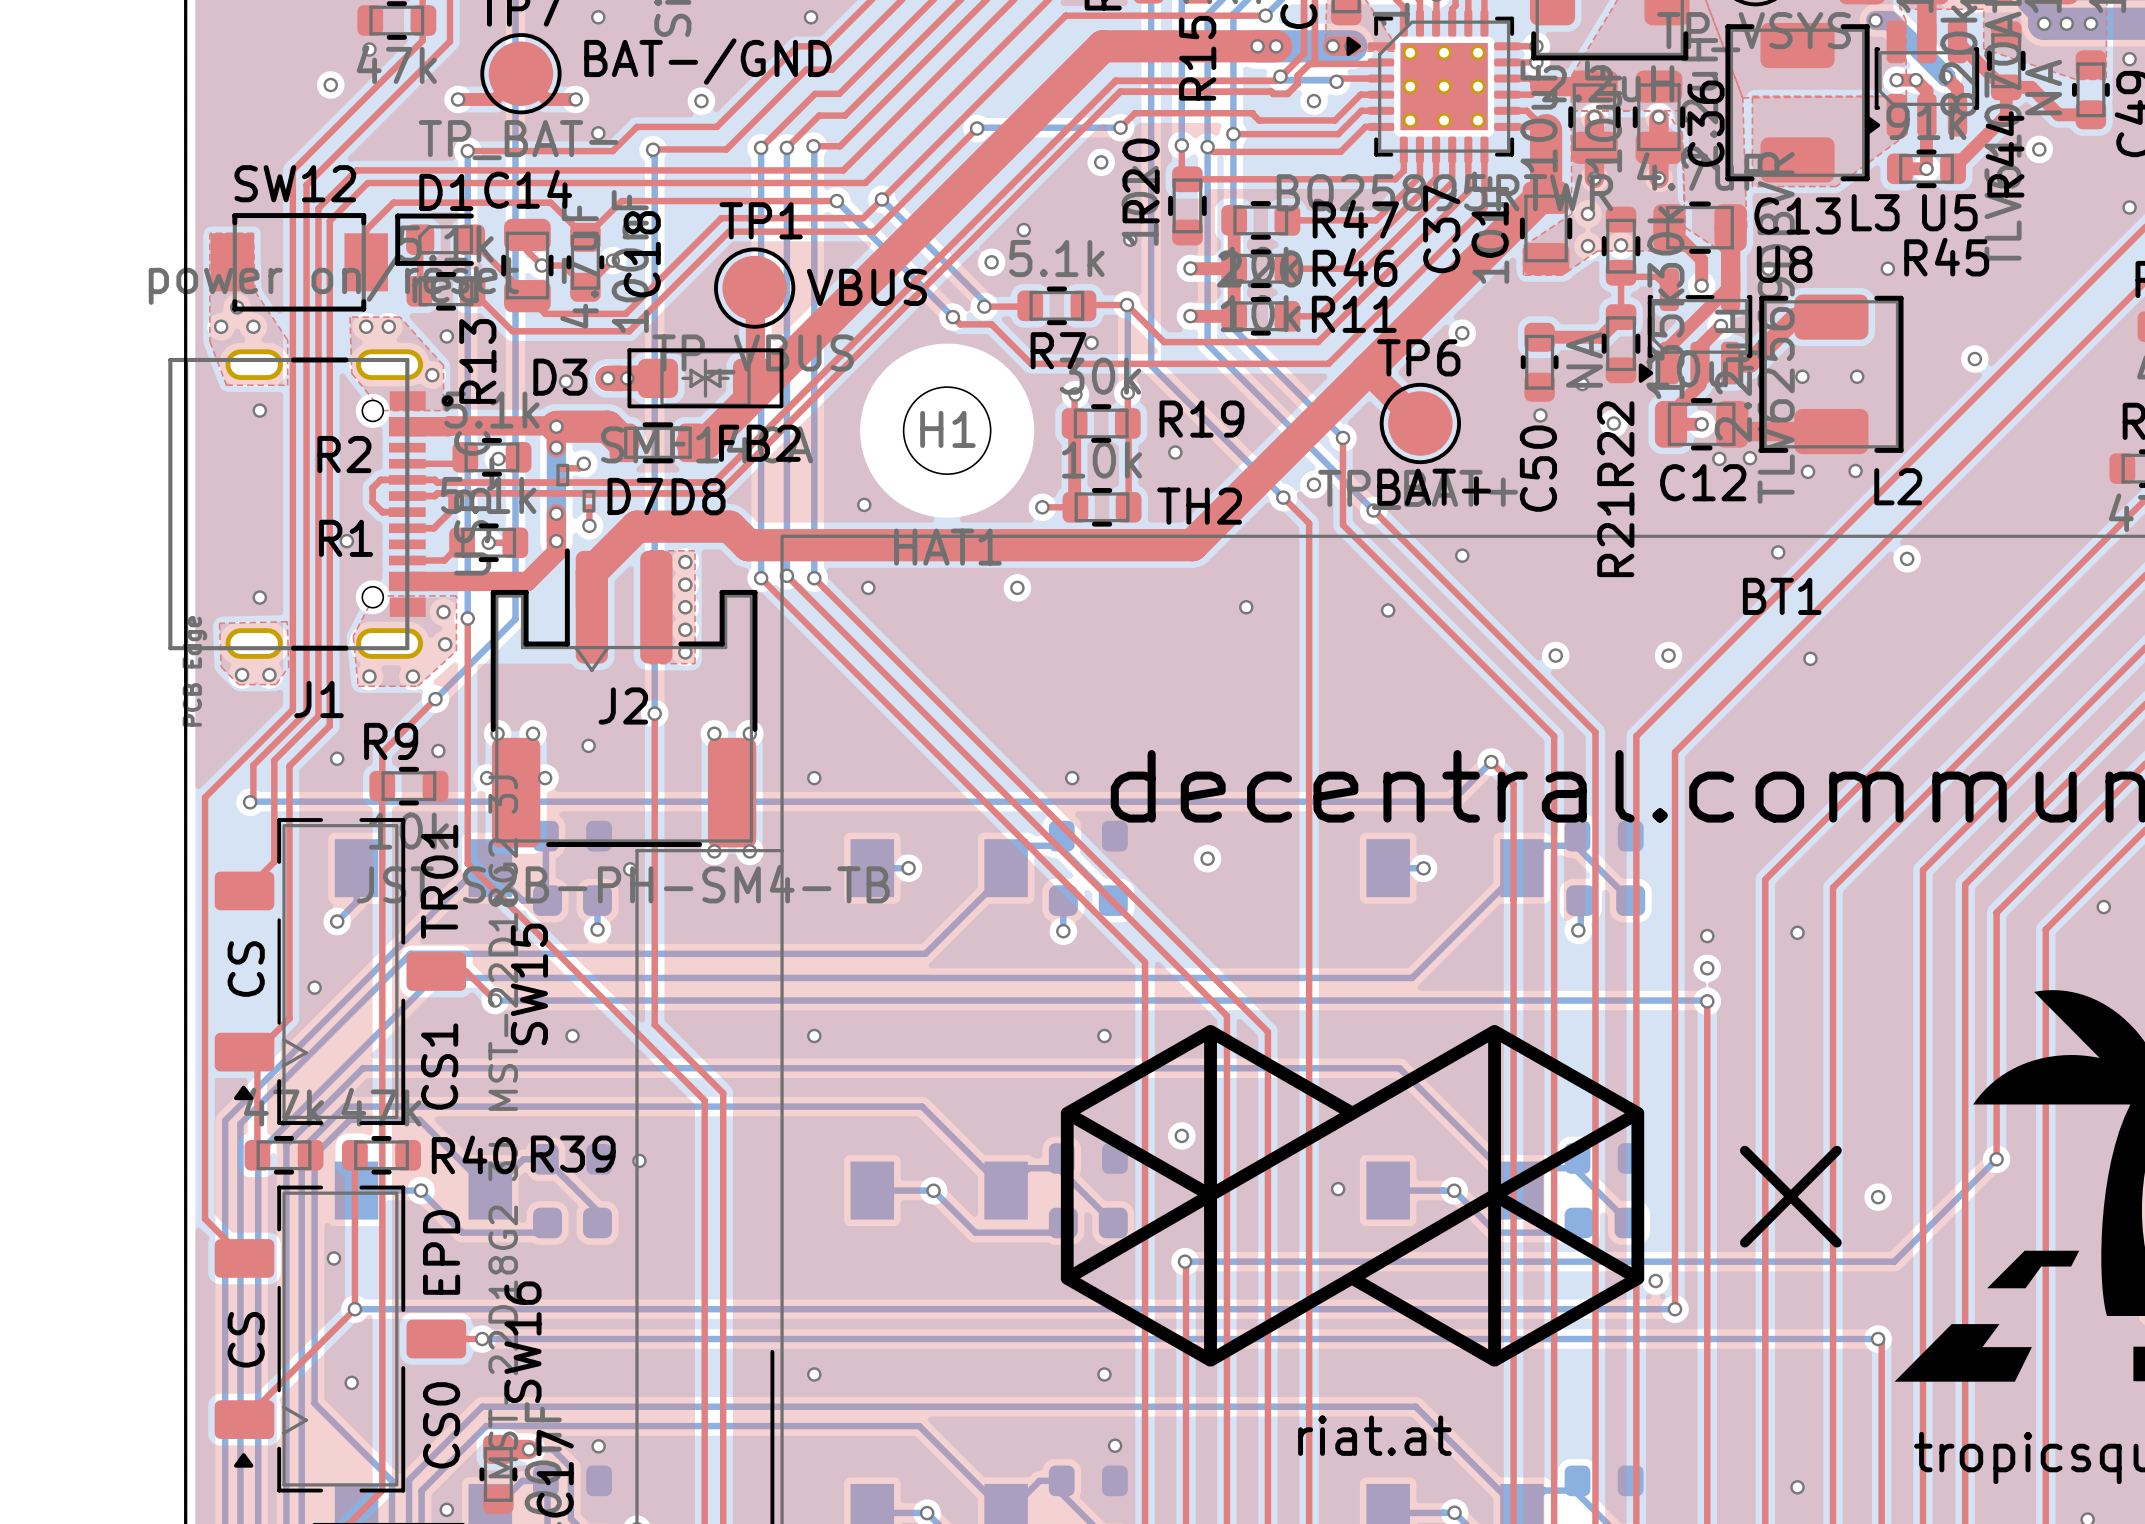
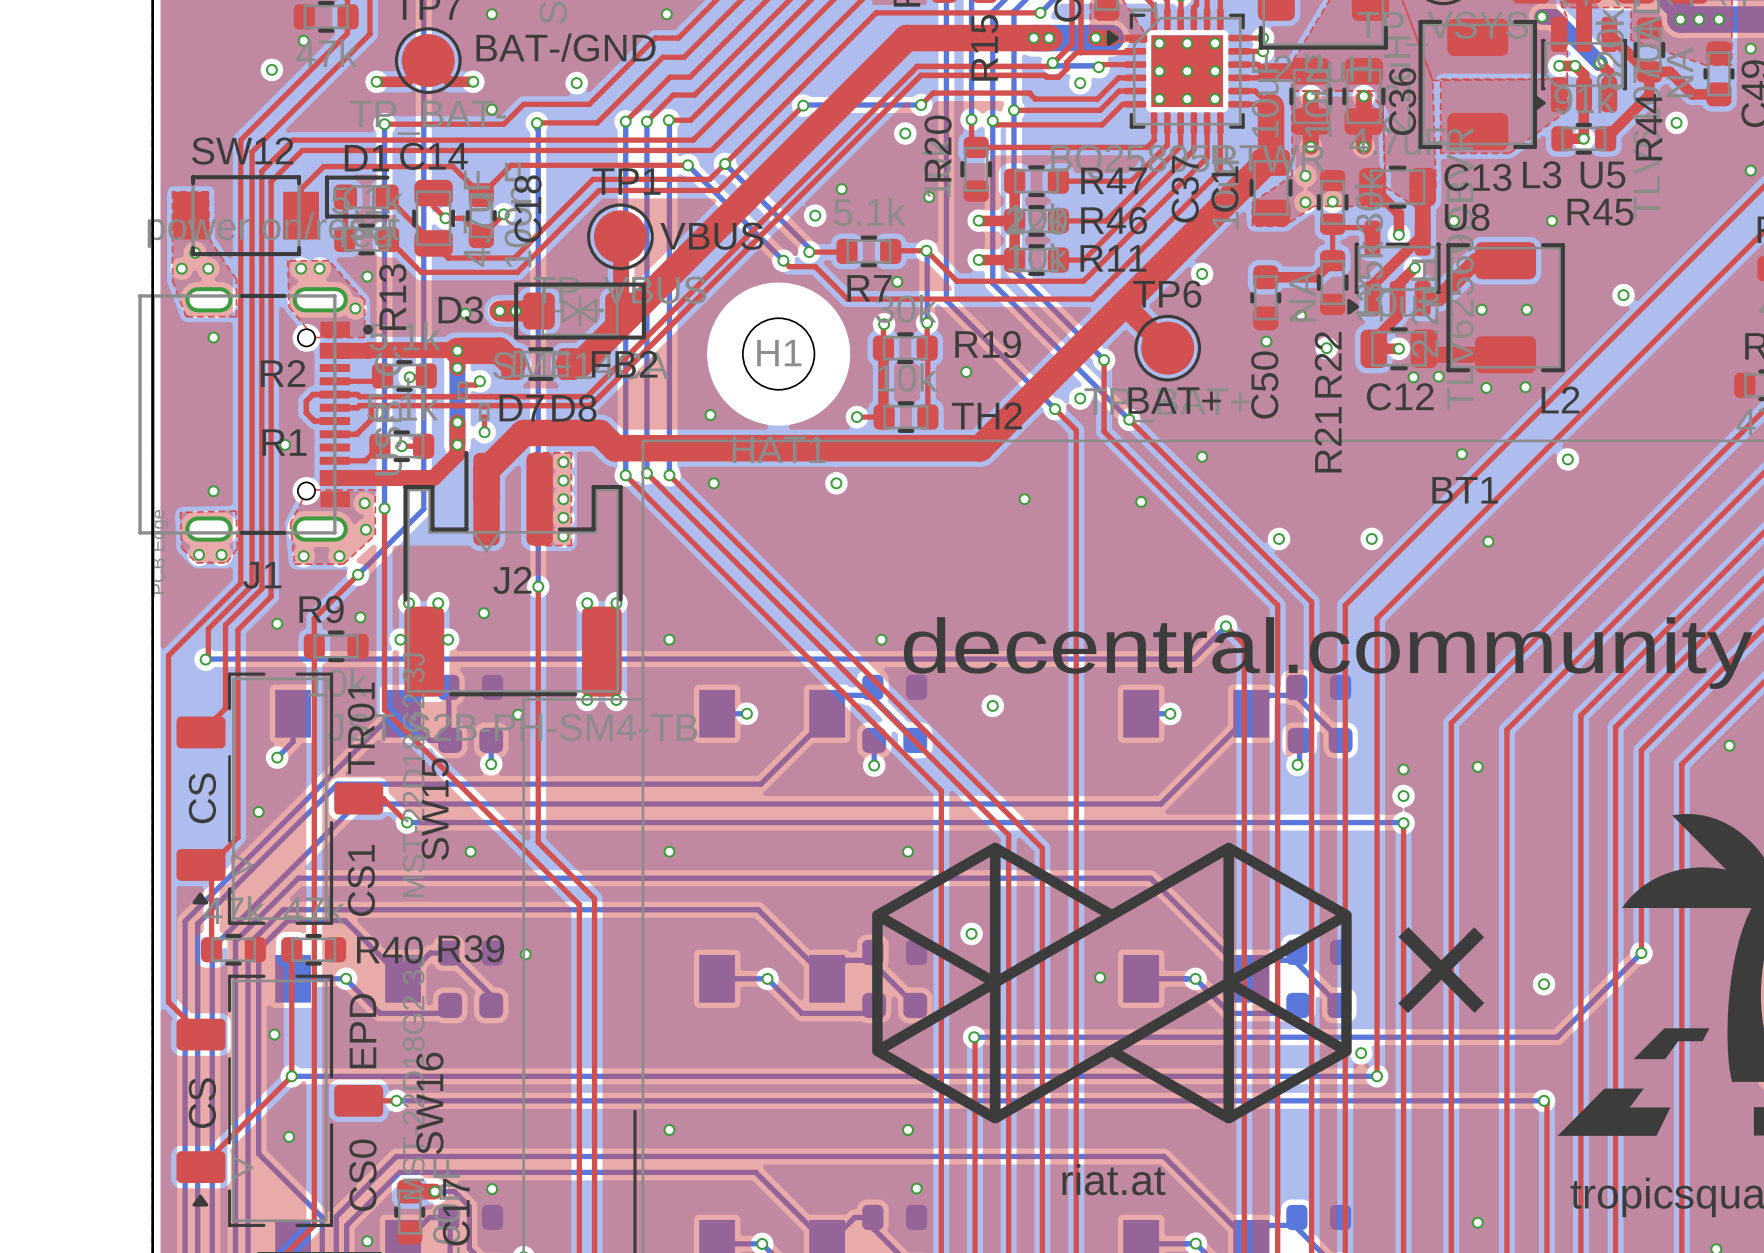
D3 footprint: [627, 348, 784, 409] -> [514, 282, 646, 340]

